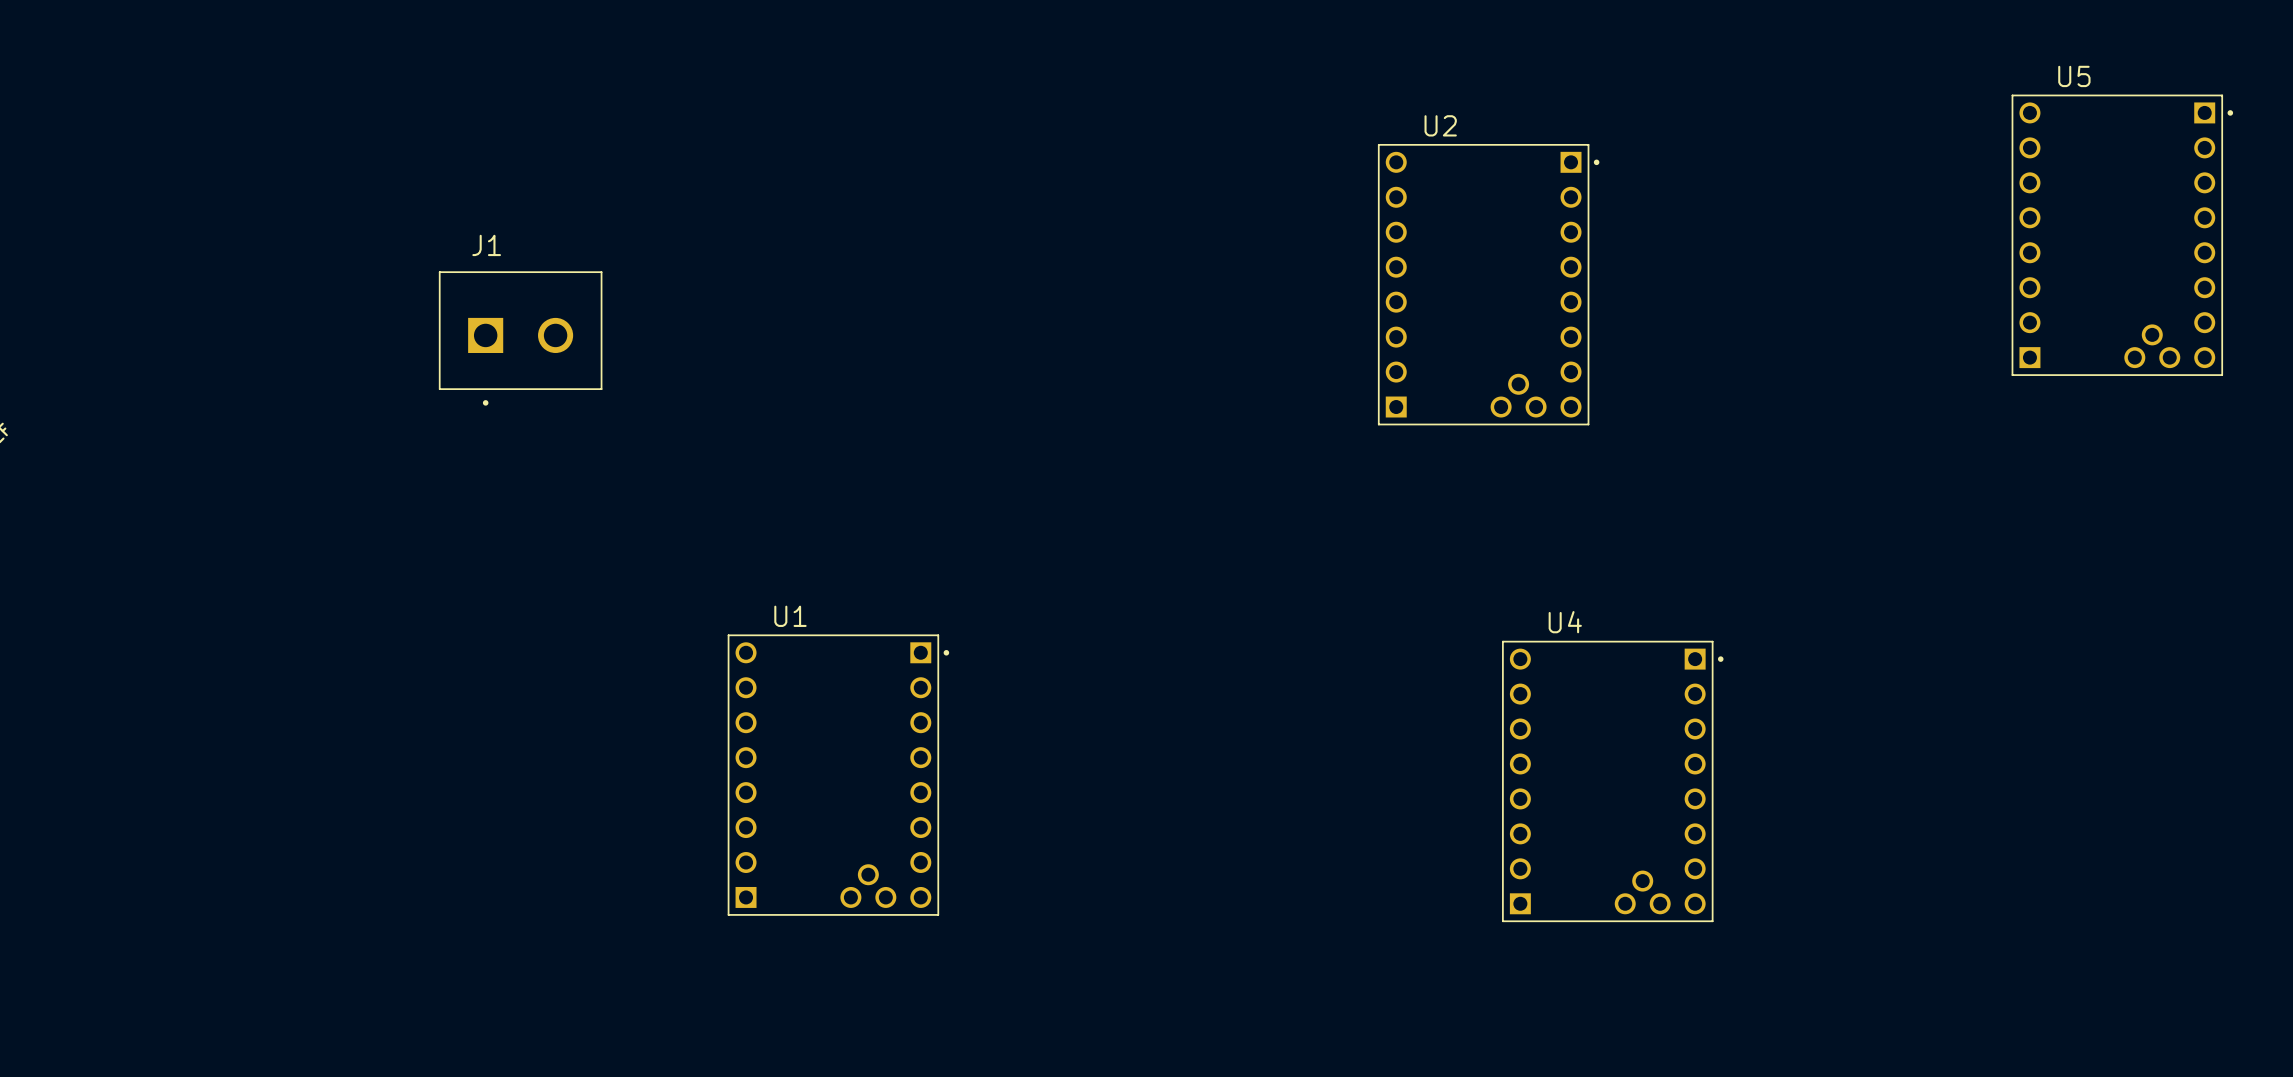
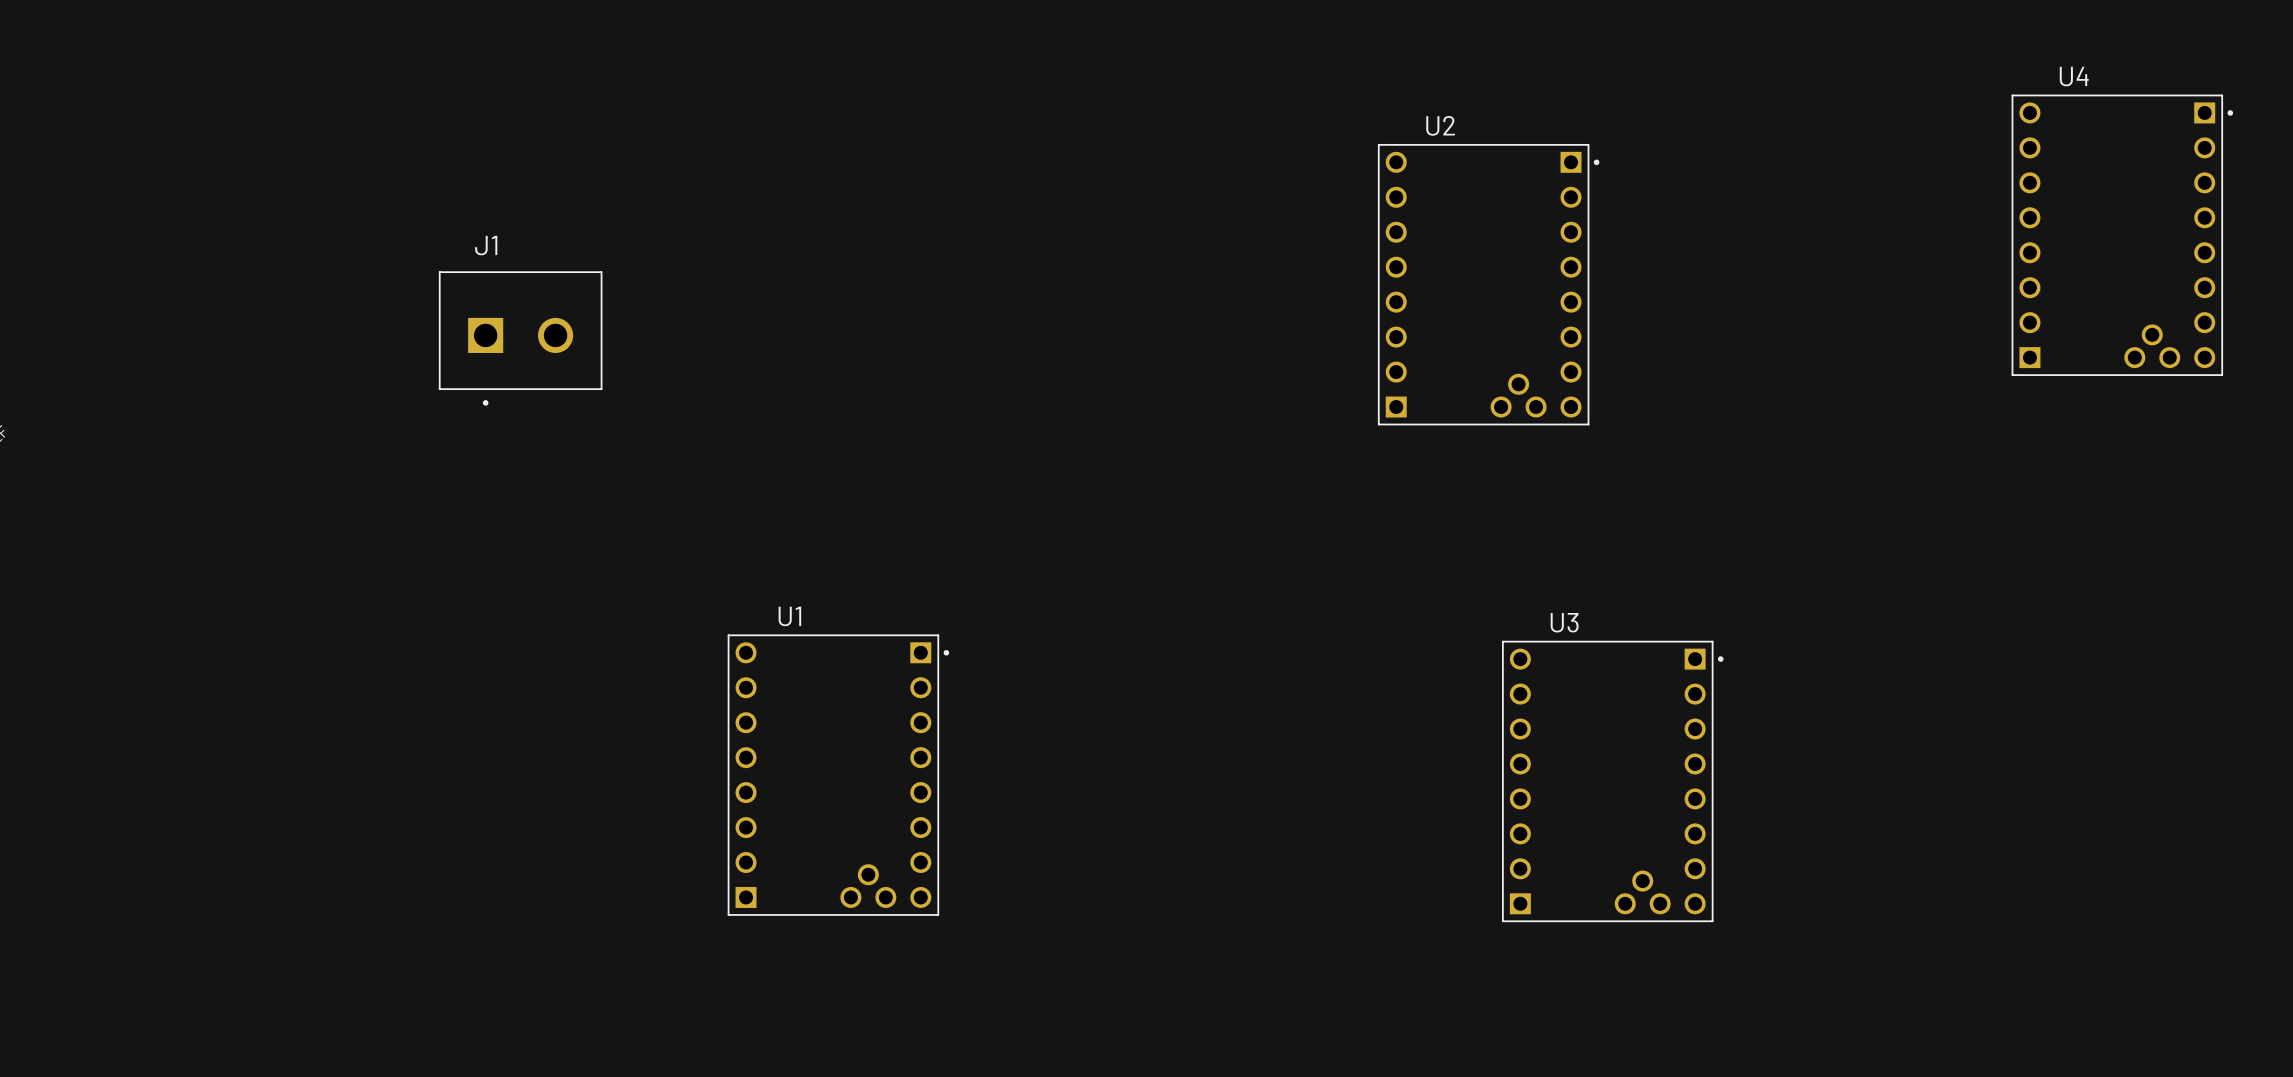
U5 name: U5 (2074, 76) -> U4 (2074, 76)
U4 name: U4 (1565, 622) -> U3 (1564, 622)

